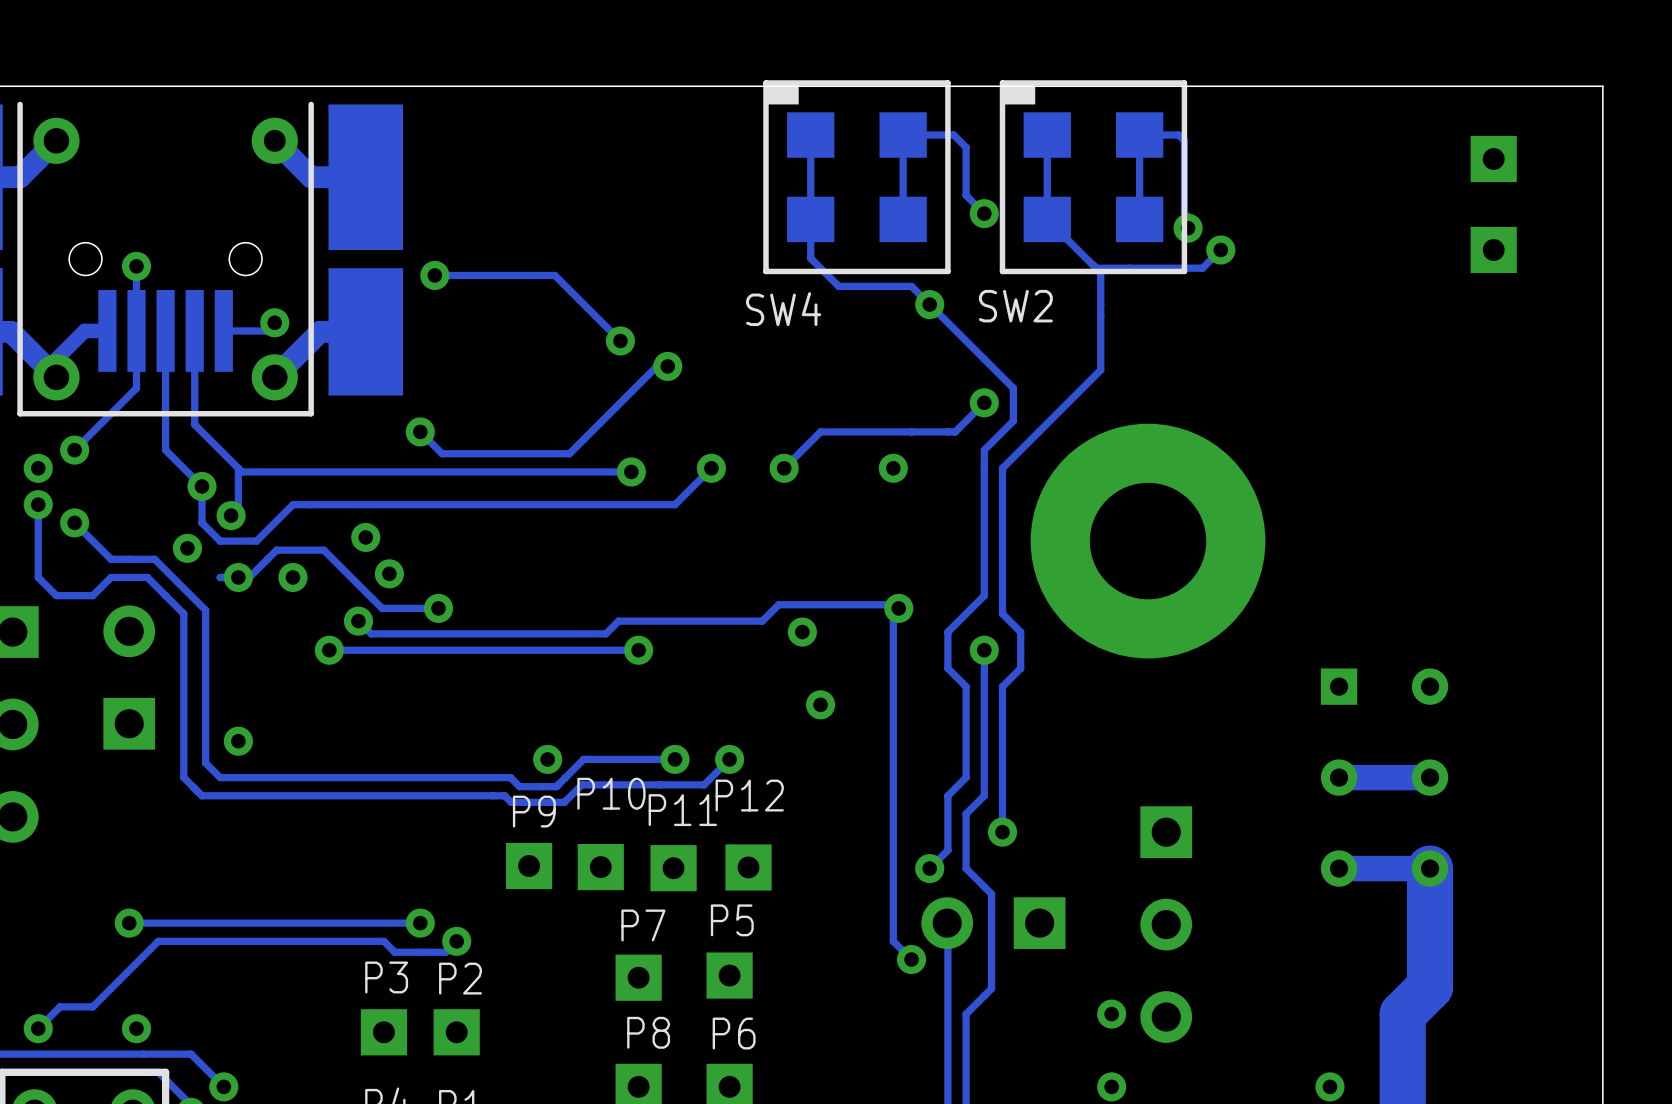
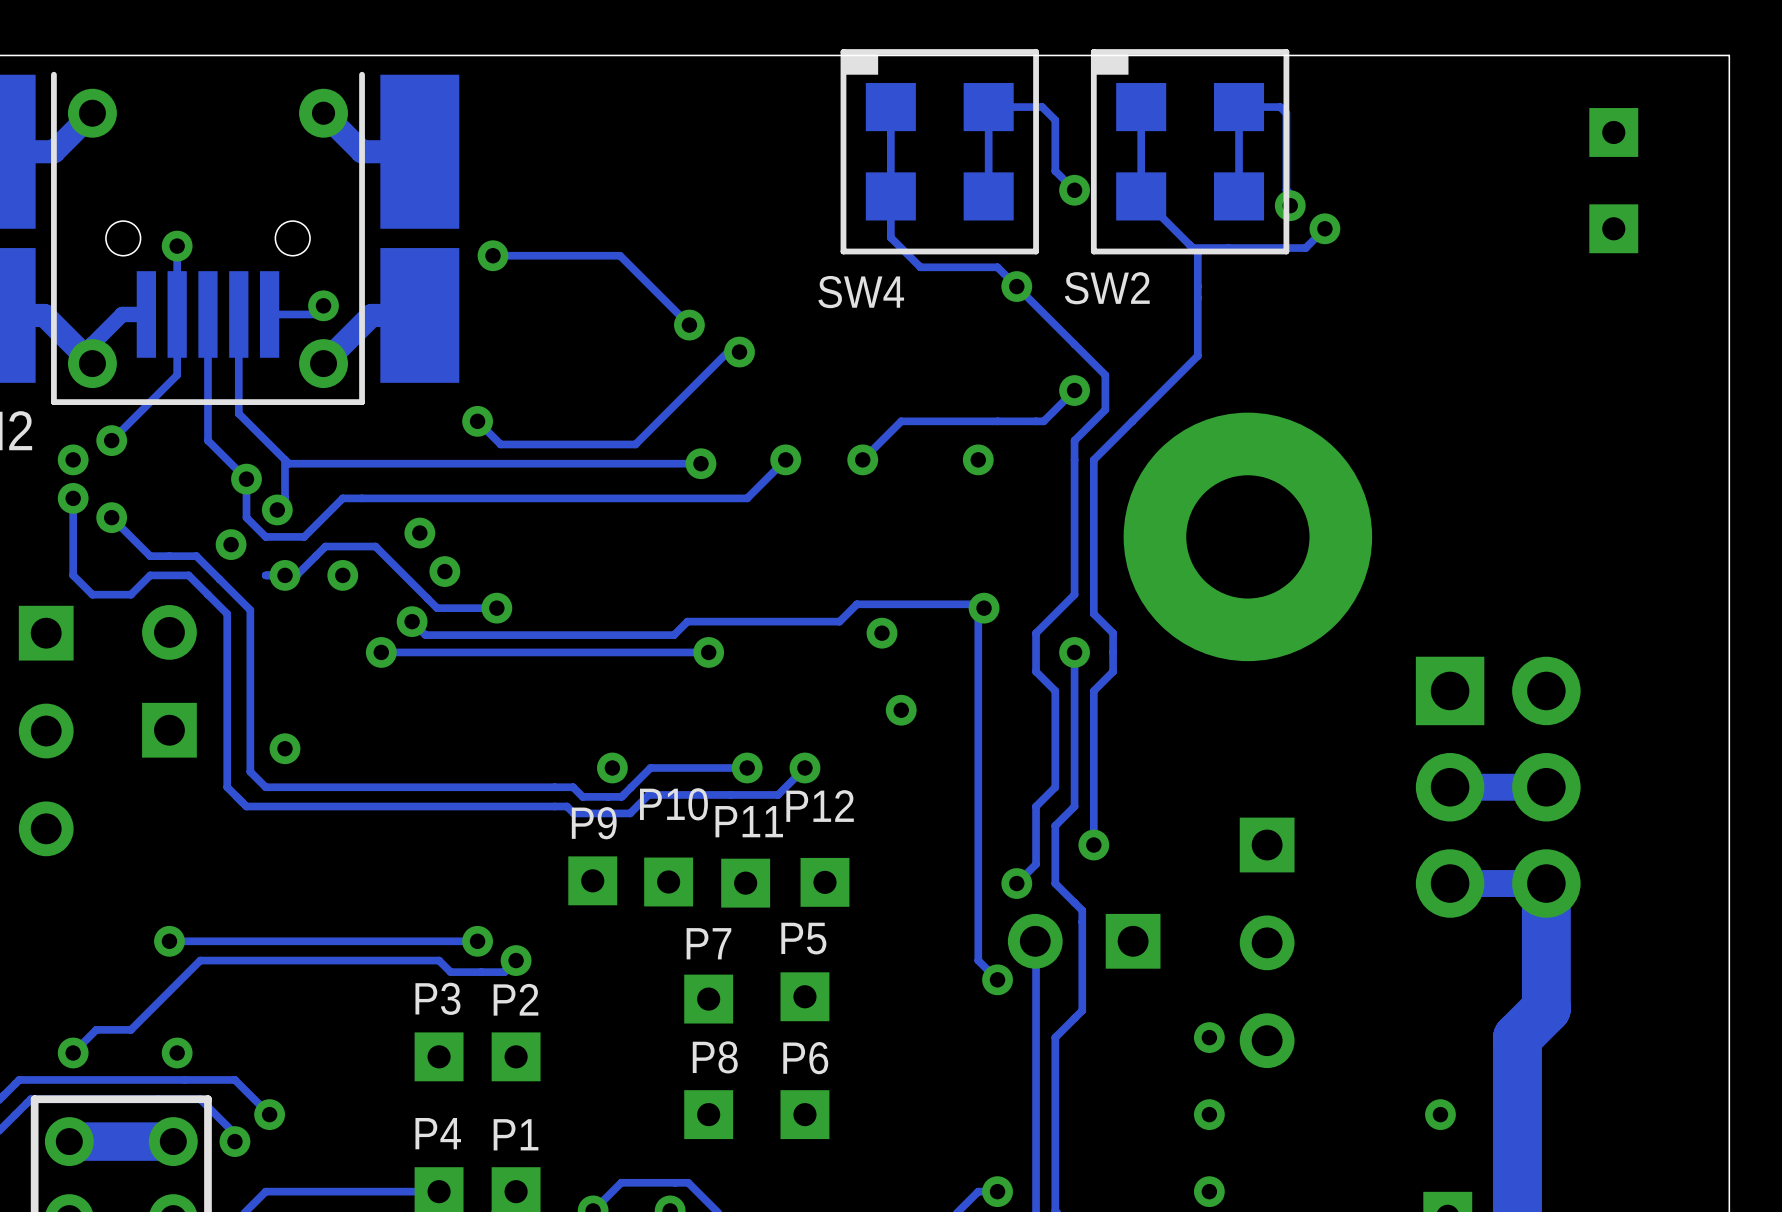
part footprint: [1320, 668, 1449, 887] -> [1415, 656, 1581, 918]

